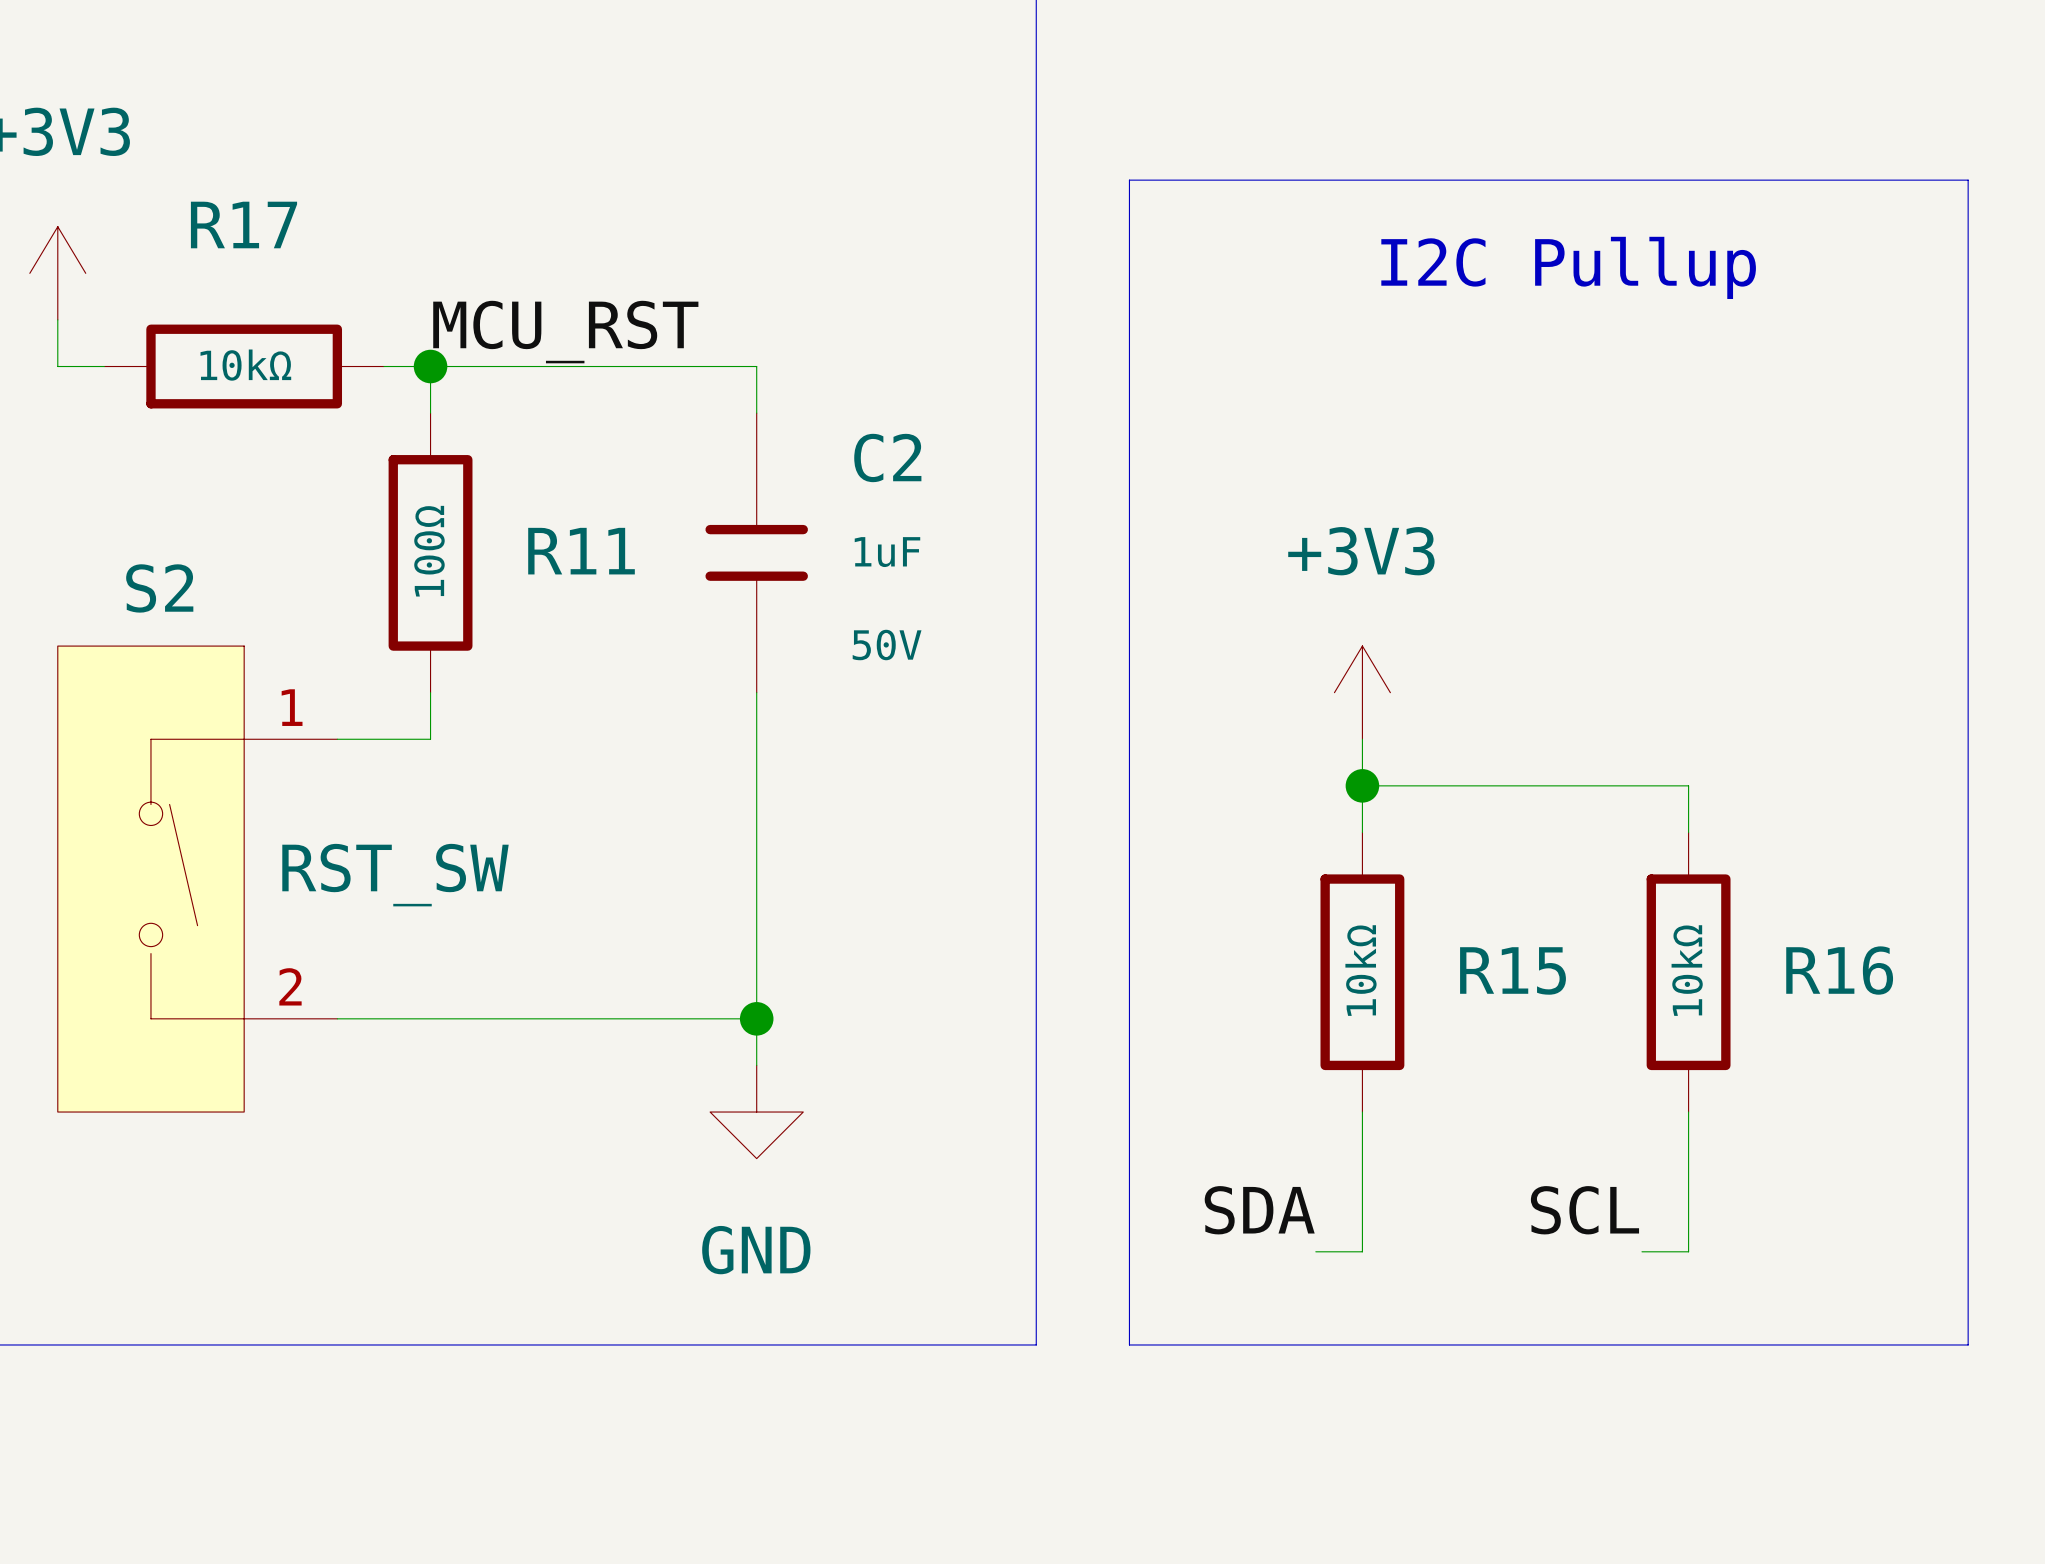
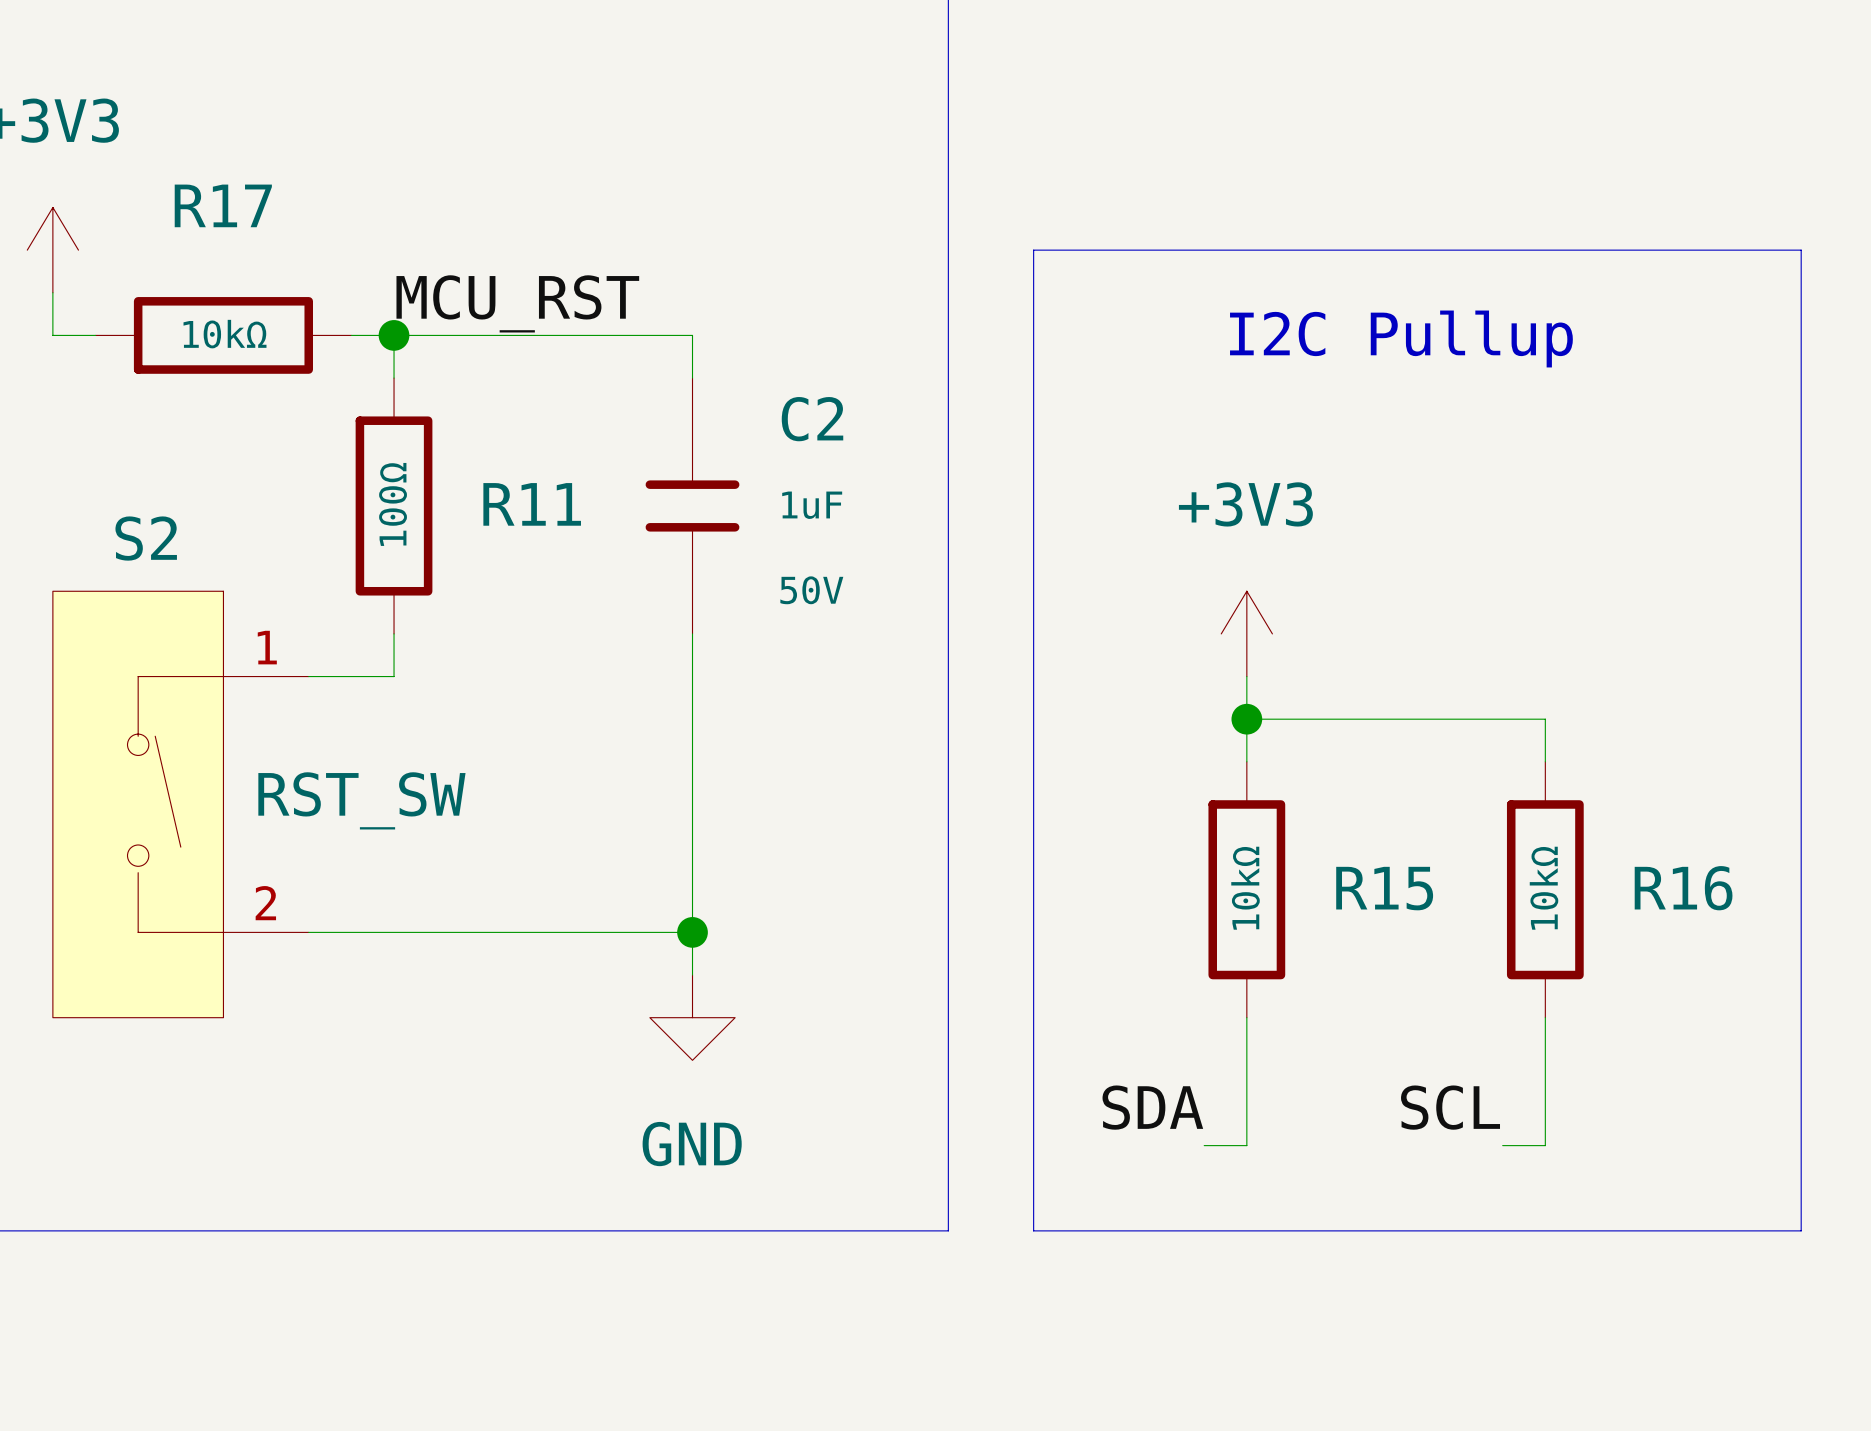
text position: I2C Pullup (1568, 267) -> I2C Pullup (1401, 338)
line: (1129, 273) (1129, 180) (1968, 180) (1968, 273) -> (1033, 250) (1801, 250)

